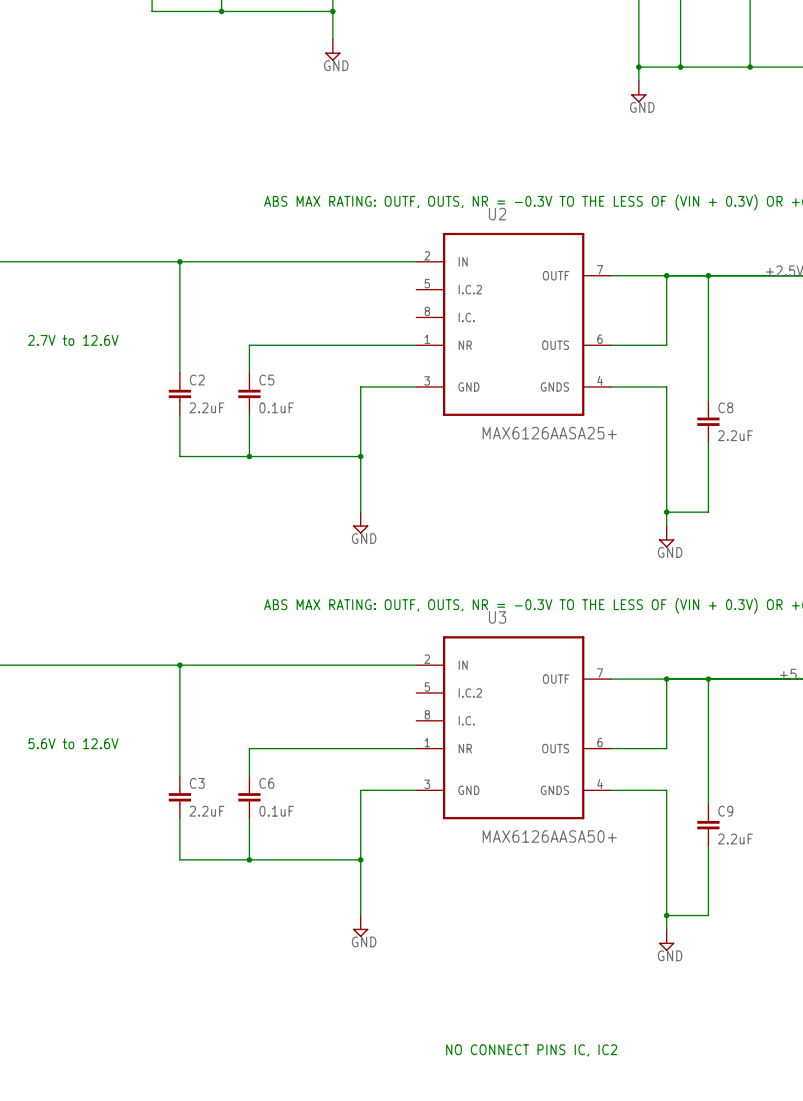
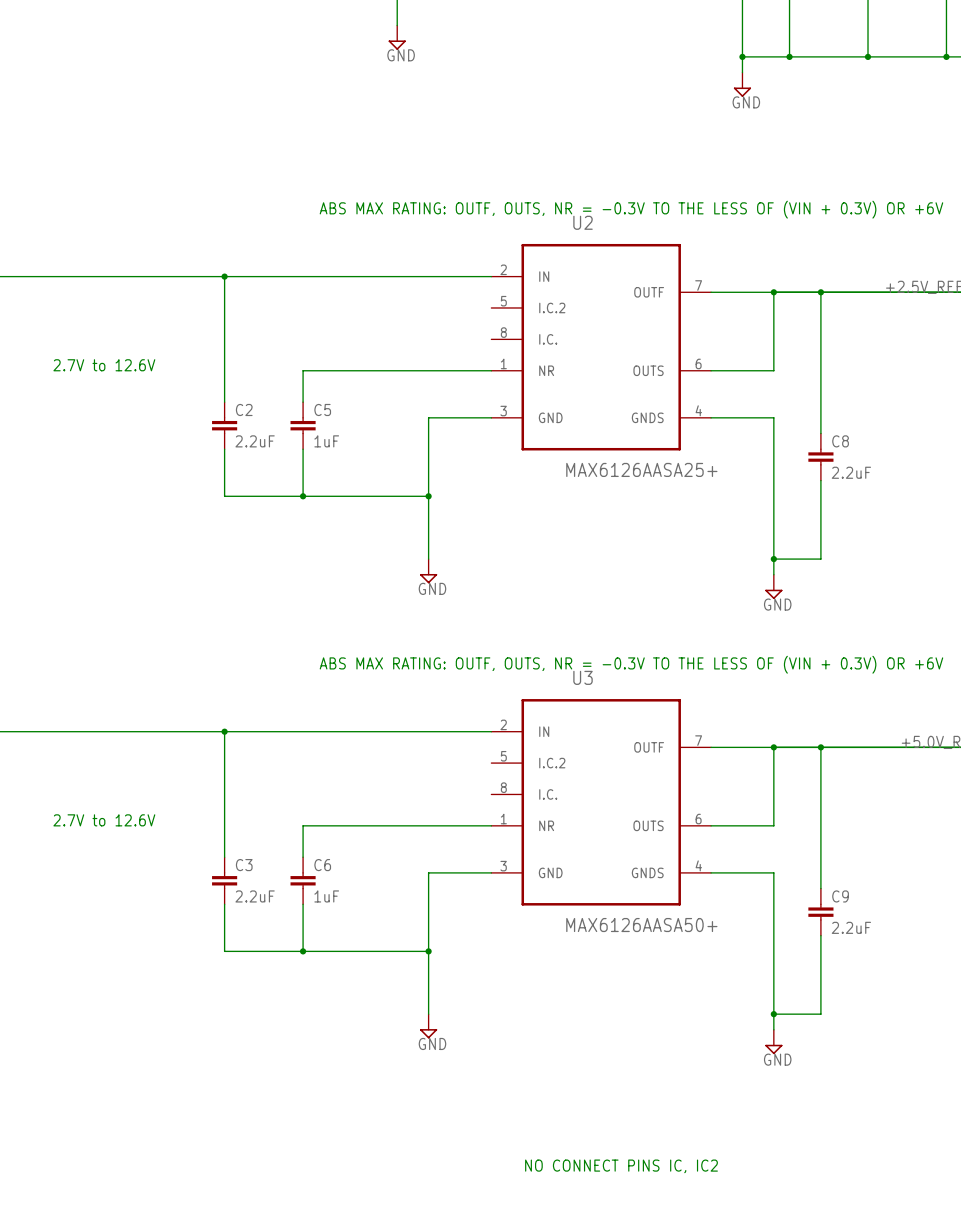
C5 value: 0.1uF (276, 407) -> 1uF (326, 441)
text: 5.6V to 12.6V (73, 743) -> 2.7V to 12.6V (104, 820)
C6 value: 0.1uF (276, 811) -> 1uF (326, 896)

